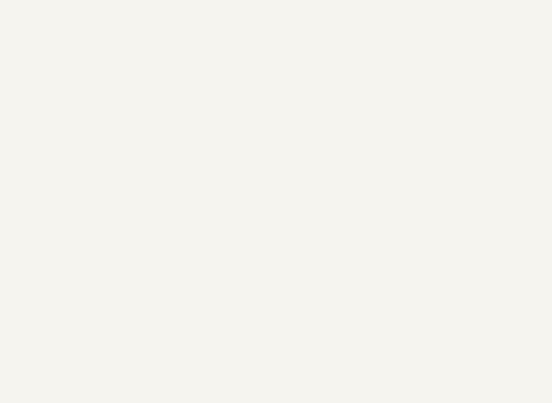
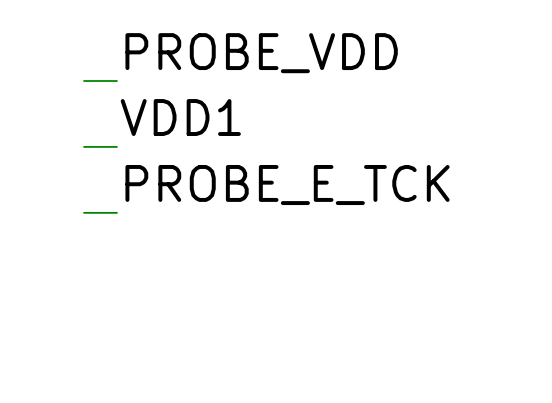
label: none -> PROBE_VDD (261, 53)
wire: none -> (84, 81) (116, 81)
label: none -> VDD1 (180, 117)
wire: none -> (84, 146) (116, 146)
label: none -> PROBE_E_TCK (287, 185)
wire: none -> (84, 212) (116, 212)

